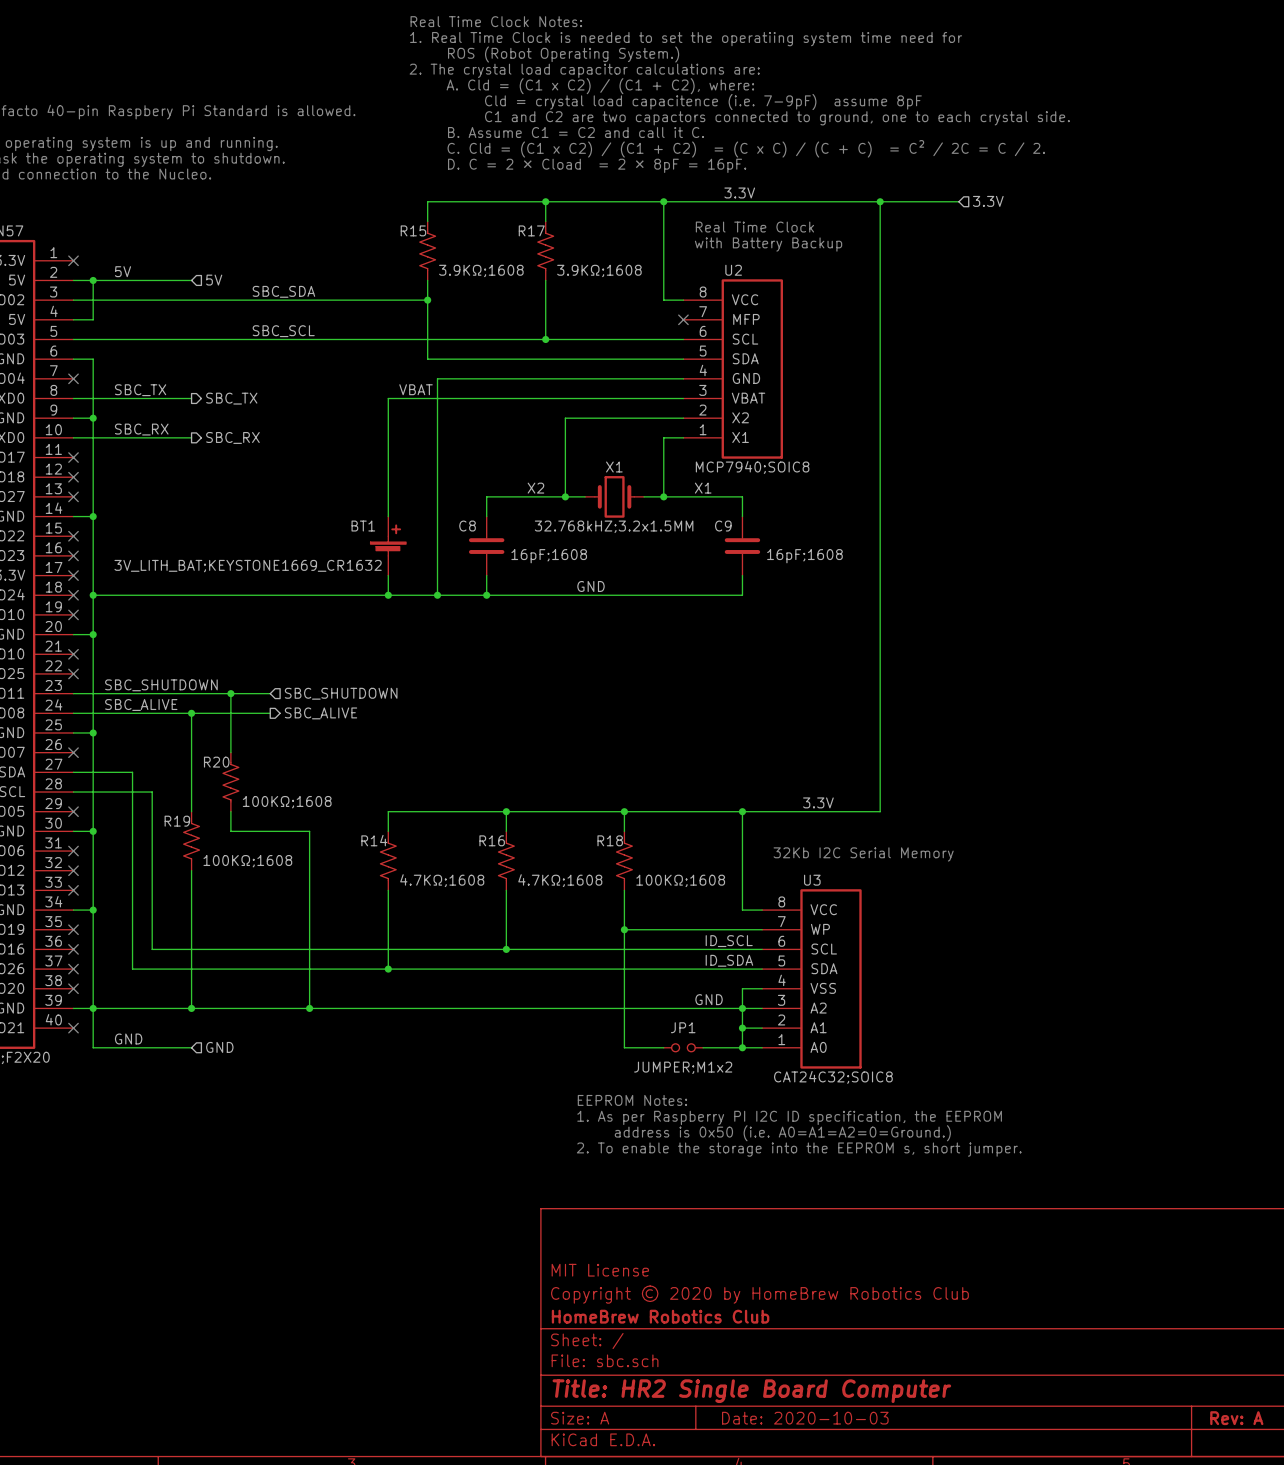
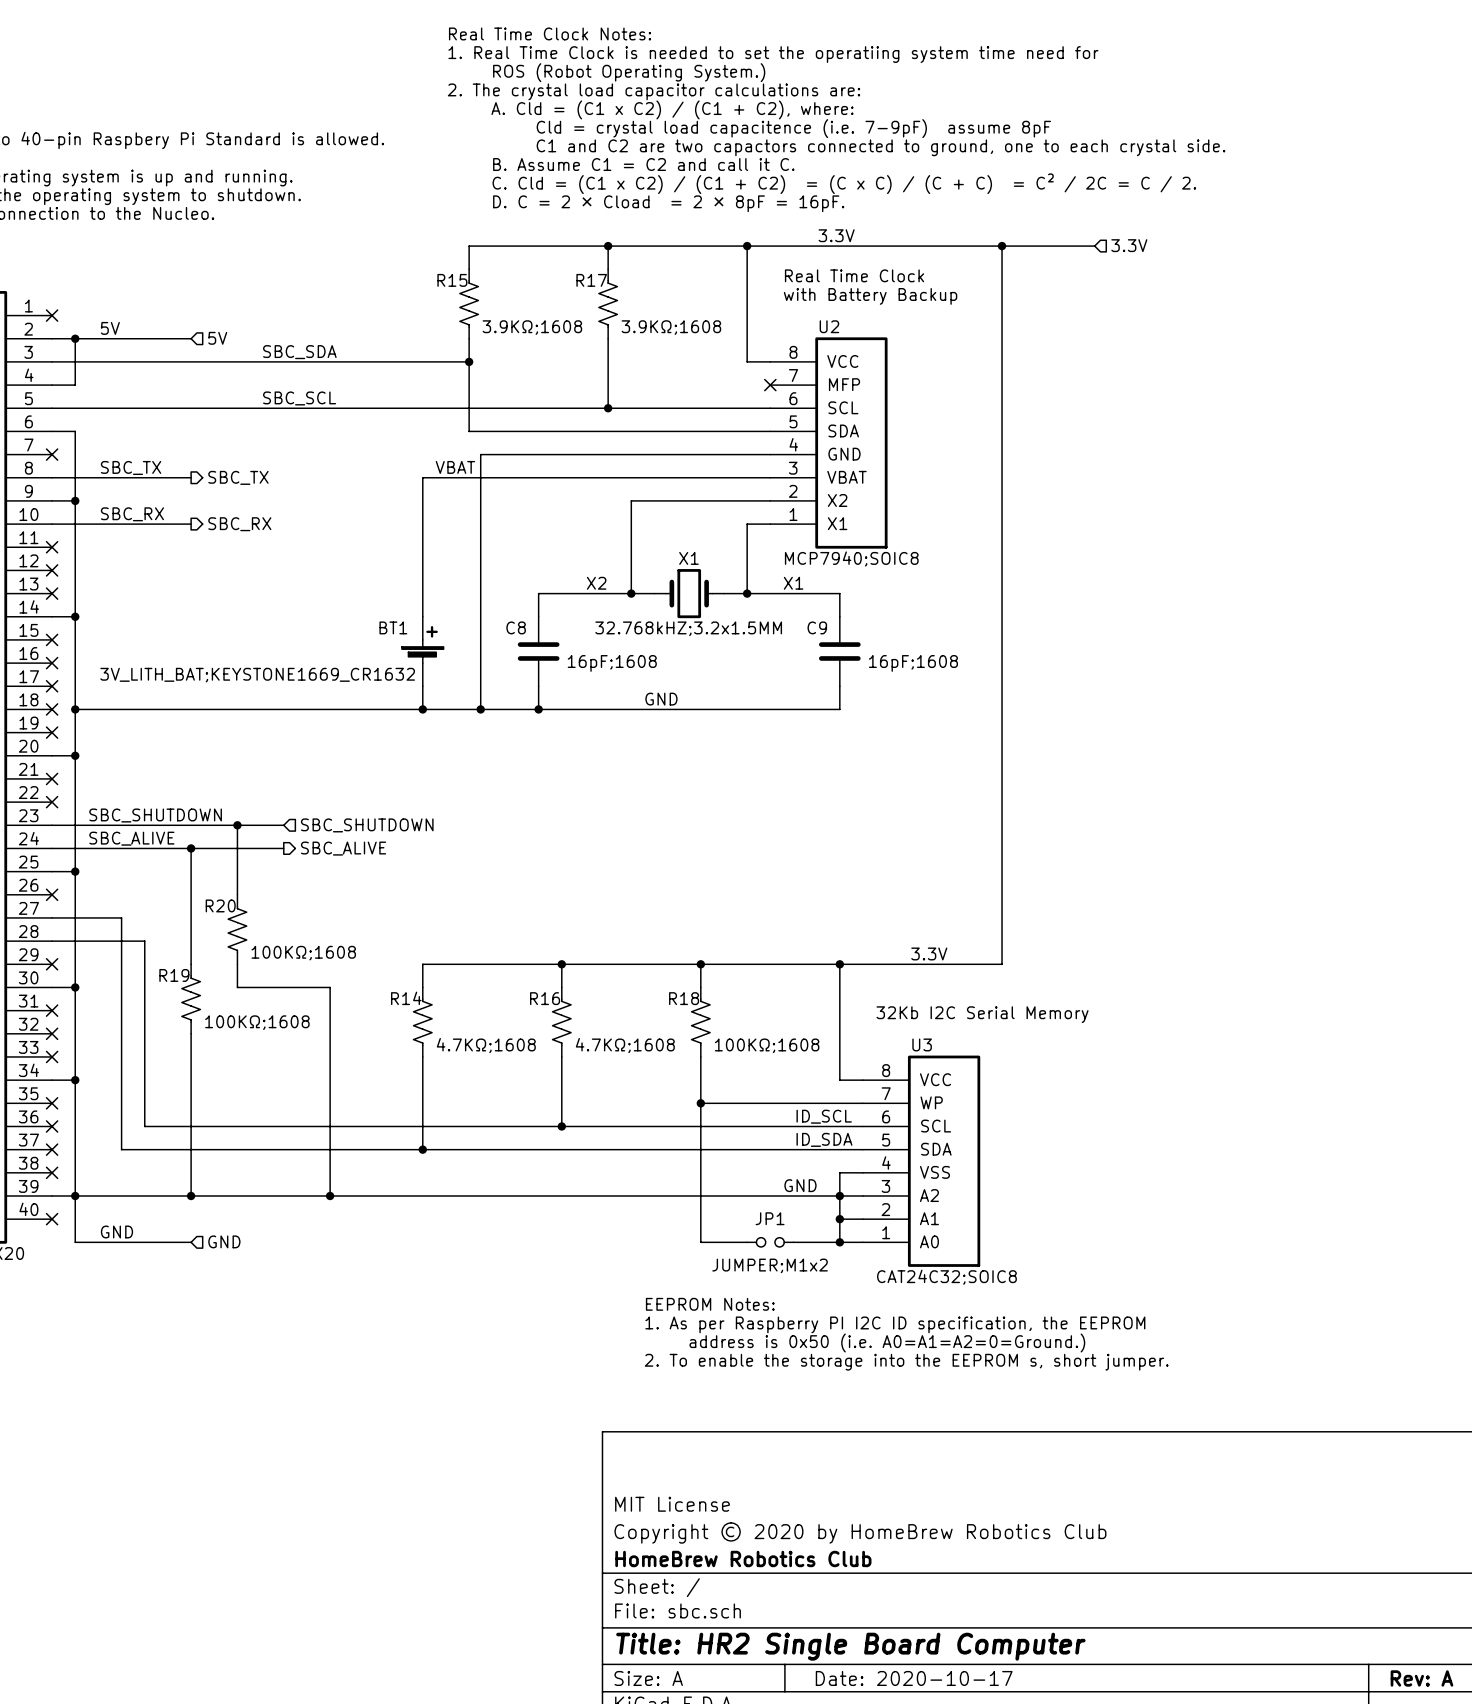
title block: Date: 2020-10-03 (805, 1418) -> Date: 2020-10-17 (914, 1678)

